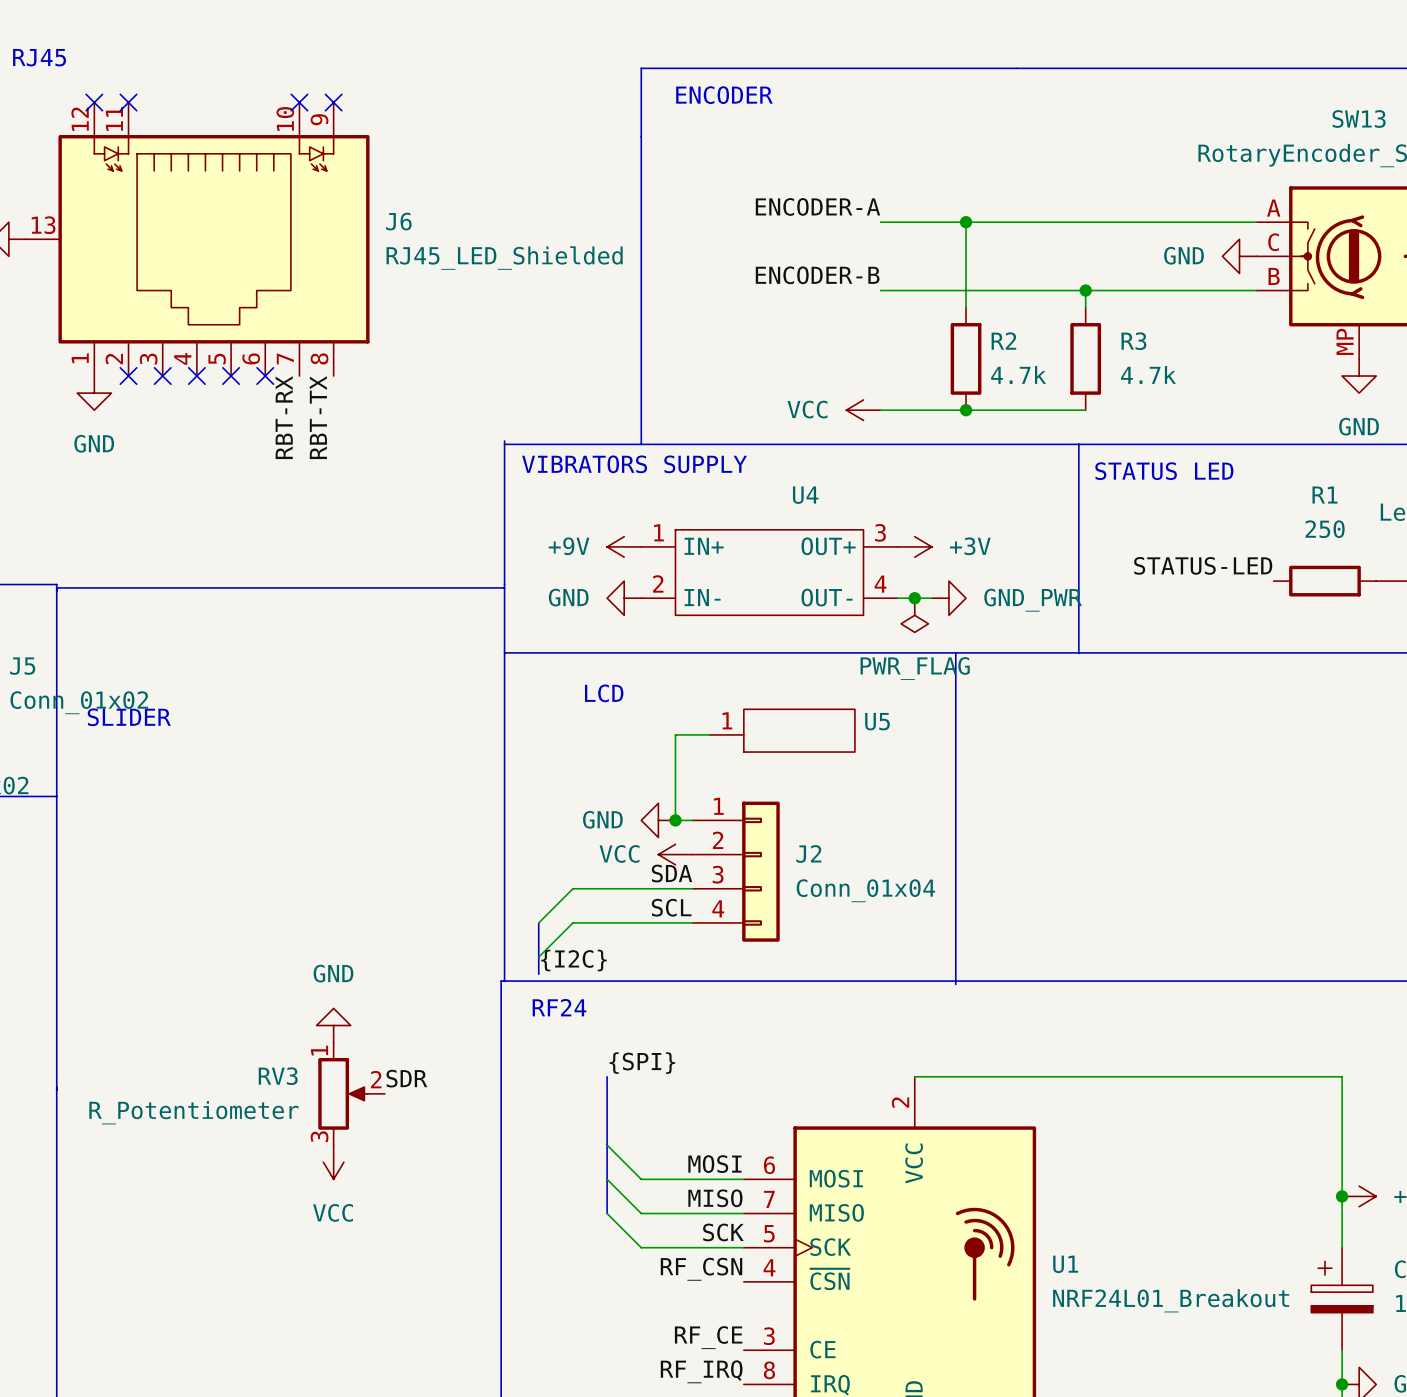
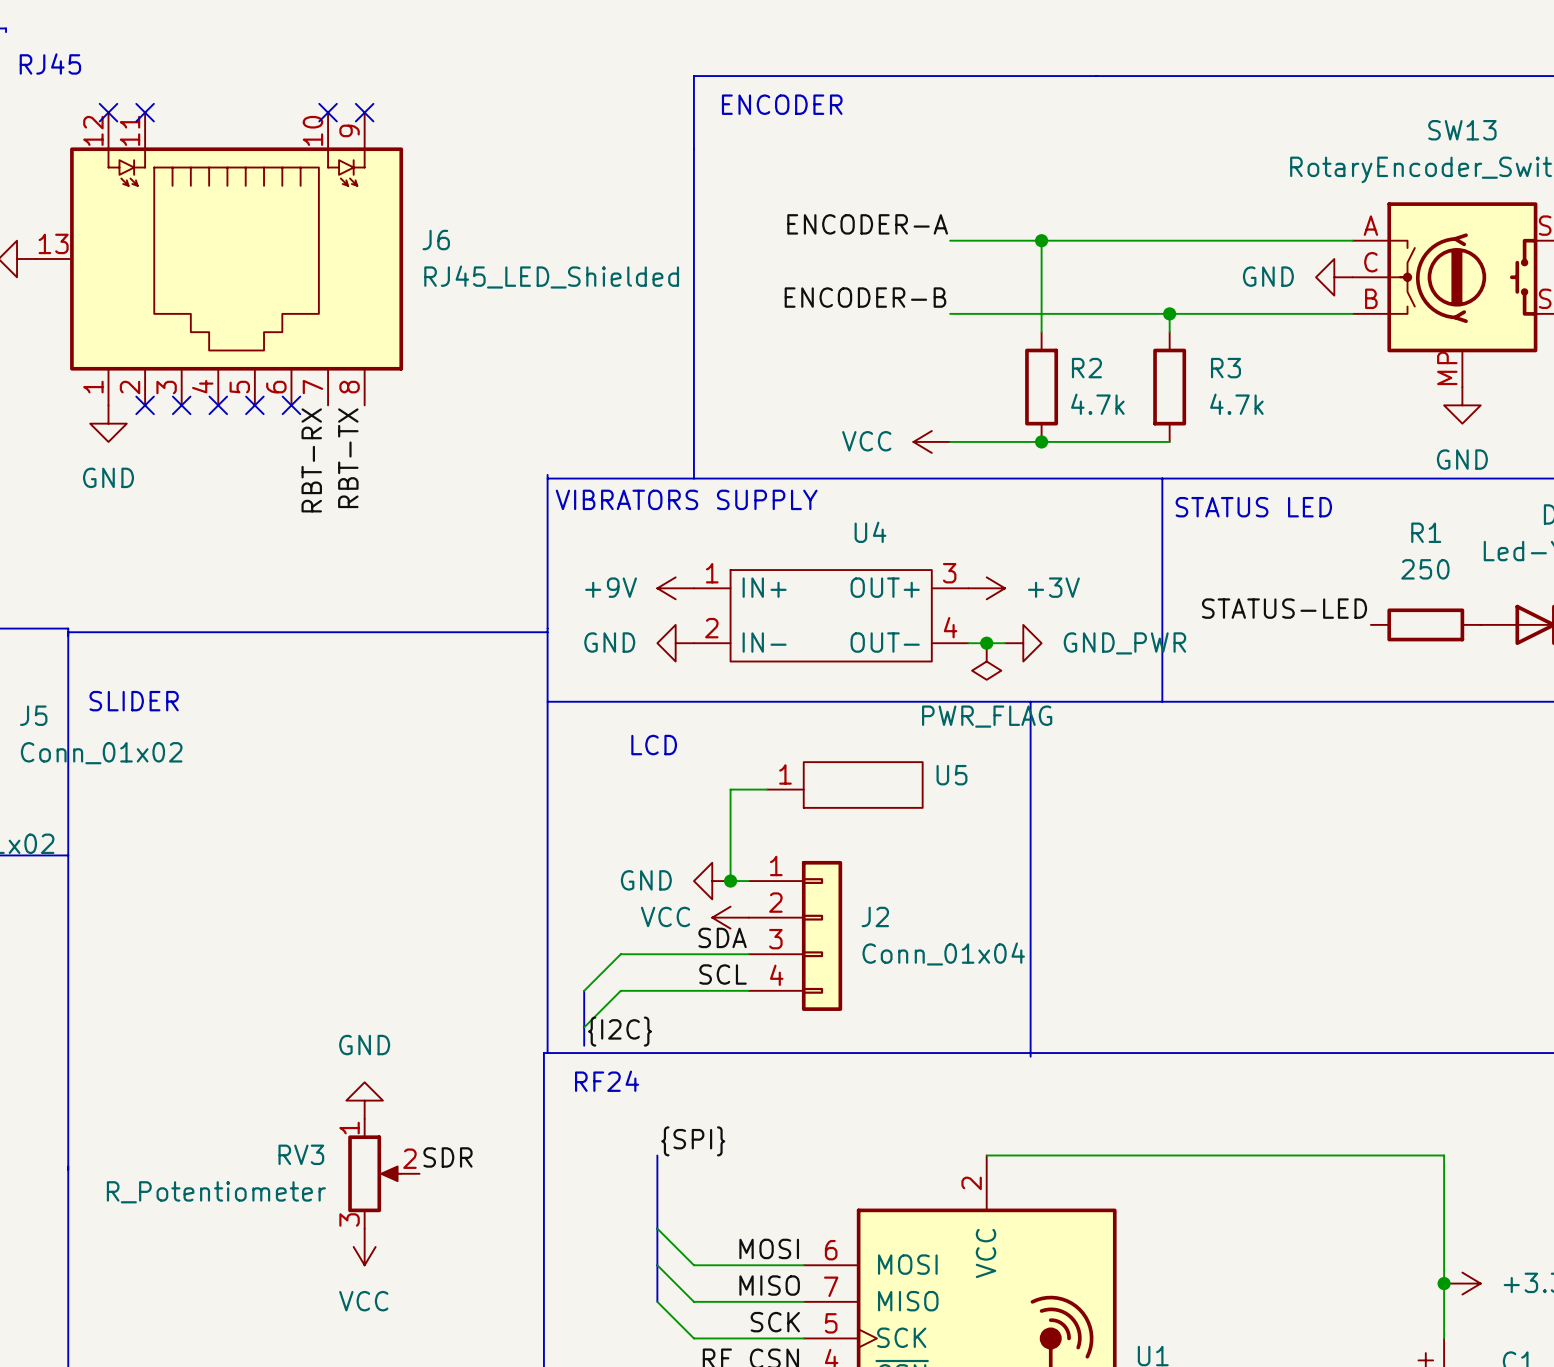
text position: SLIDER (129, 717) -> SLIDER (134, 701)

